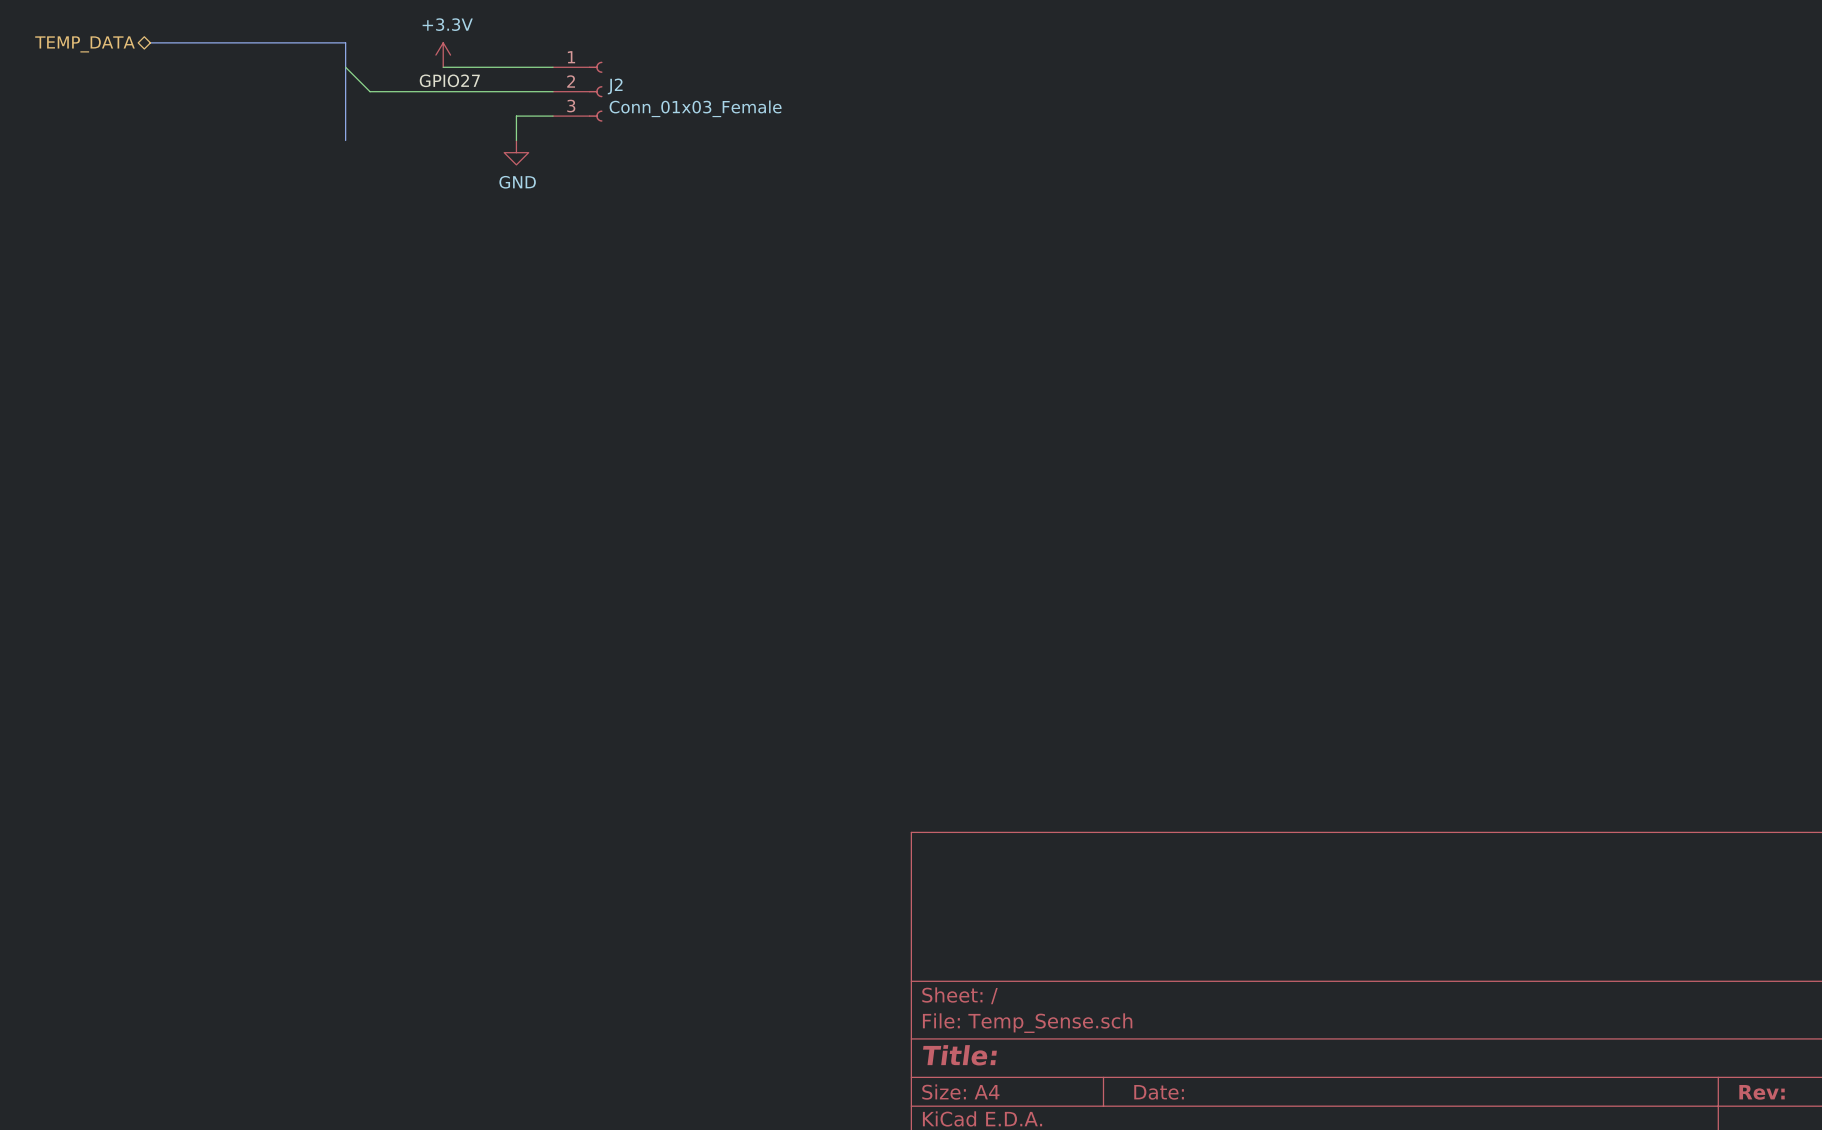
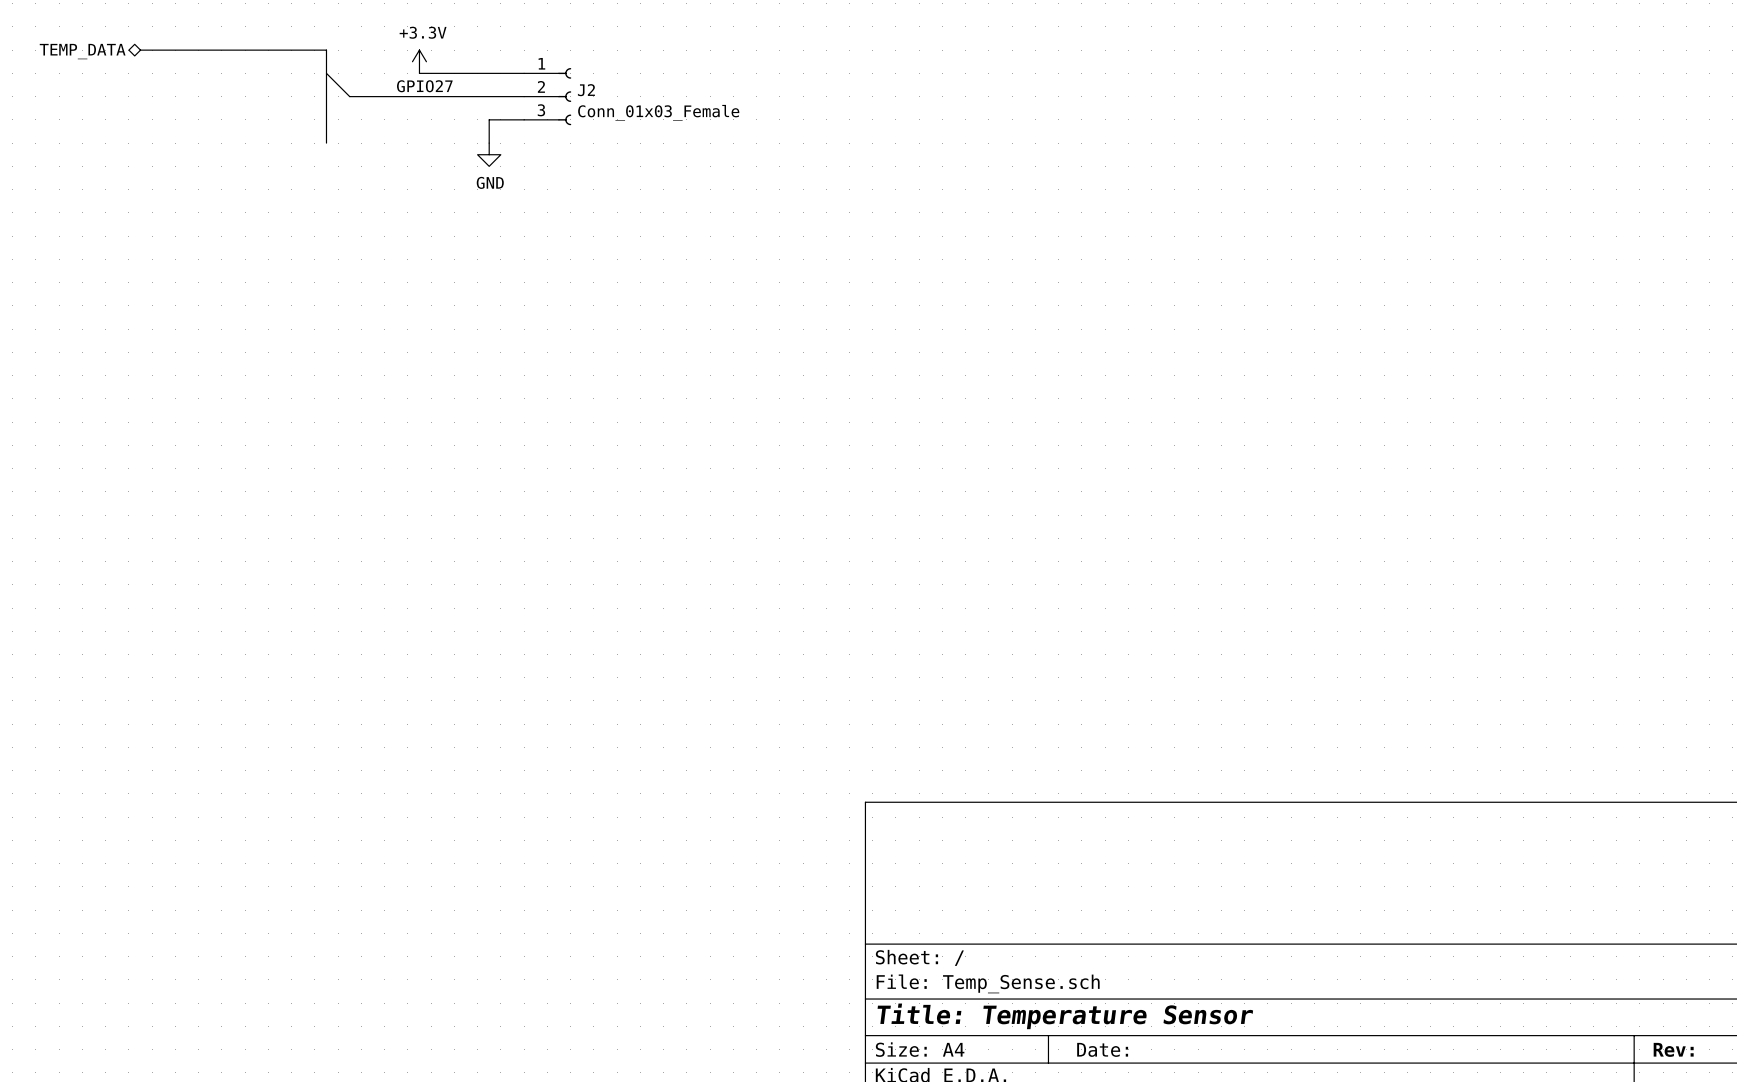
title block: Title: (959, 1055) -> Title: Temperature Sensor (1065, 1016)

